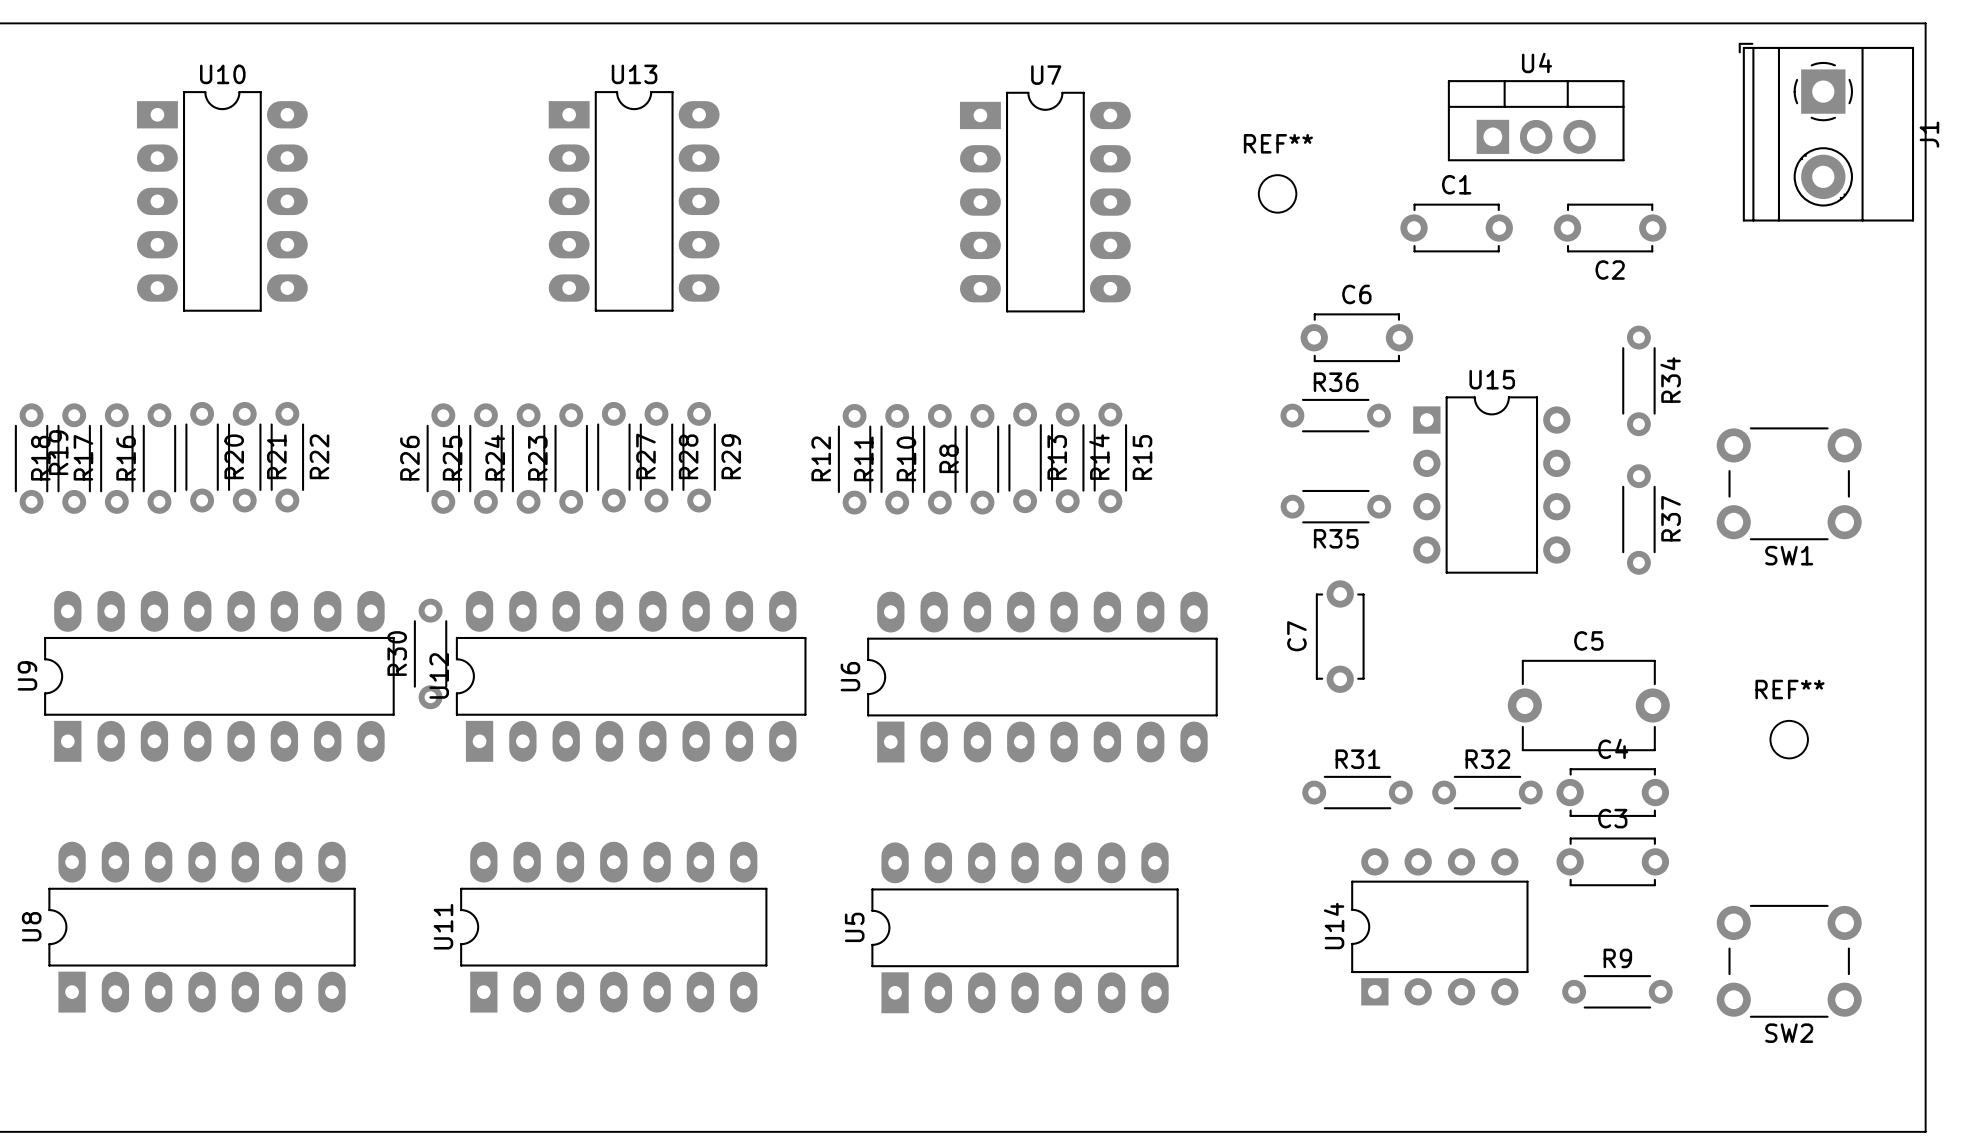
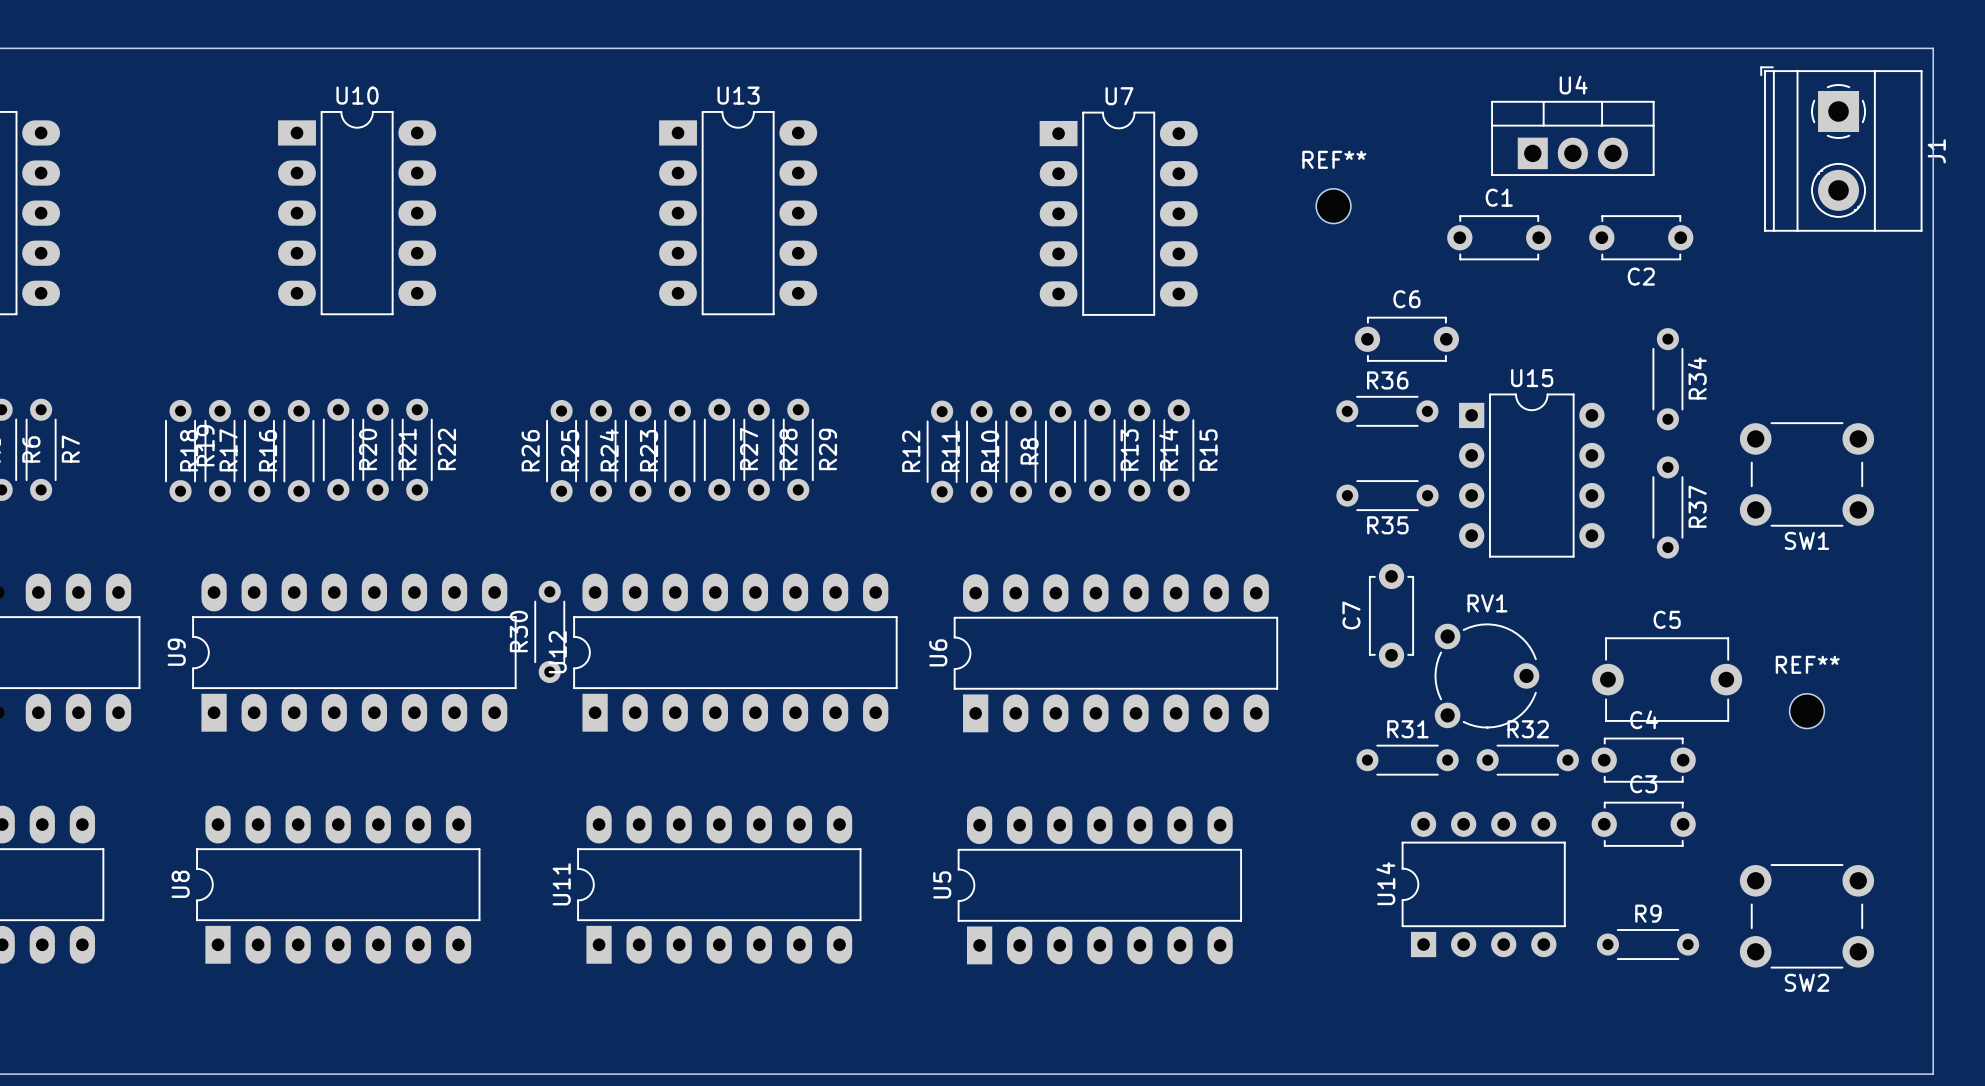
RV1: none -> (1486, 675)
C5 position: (1588, 705) -> (1667, 679)

